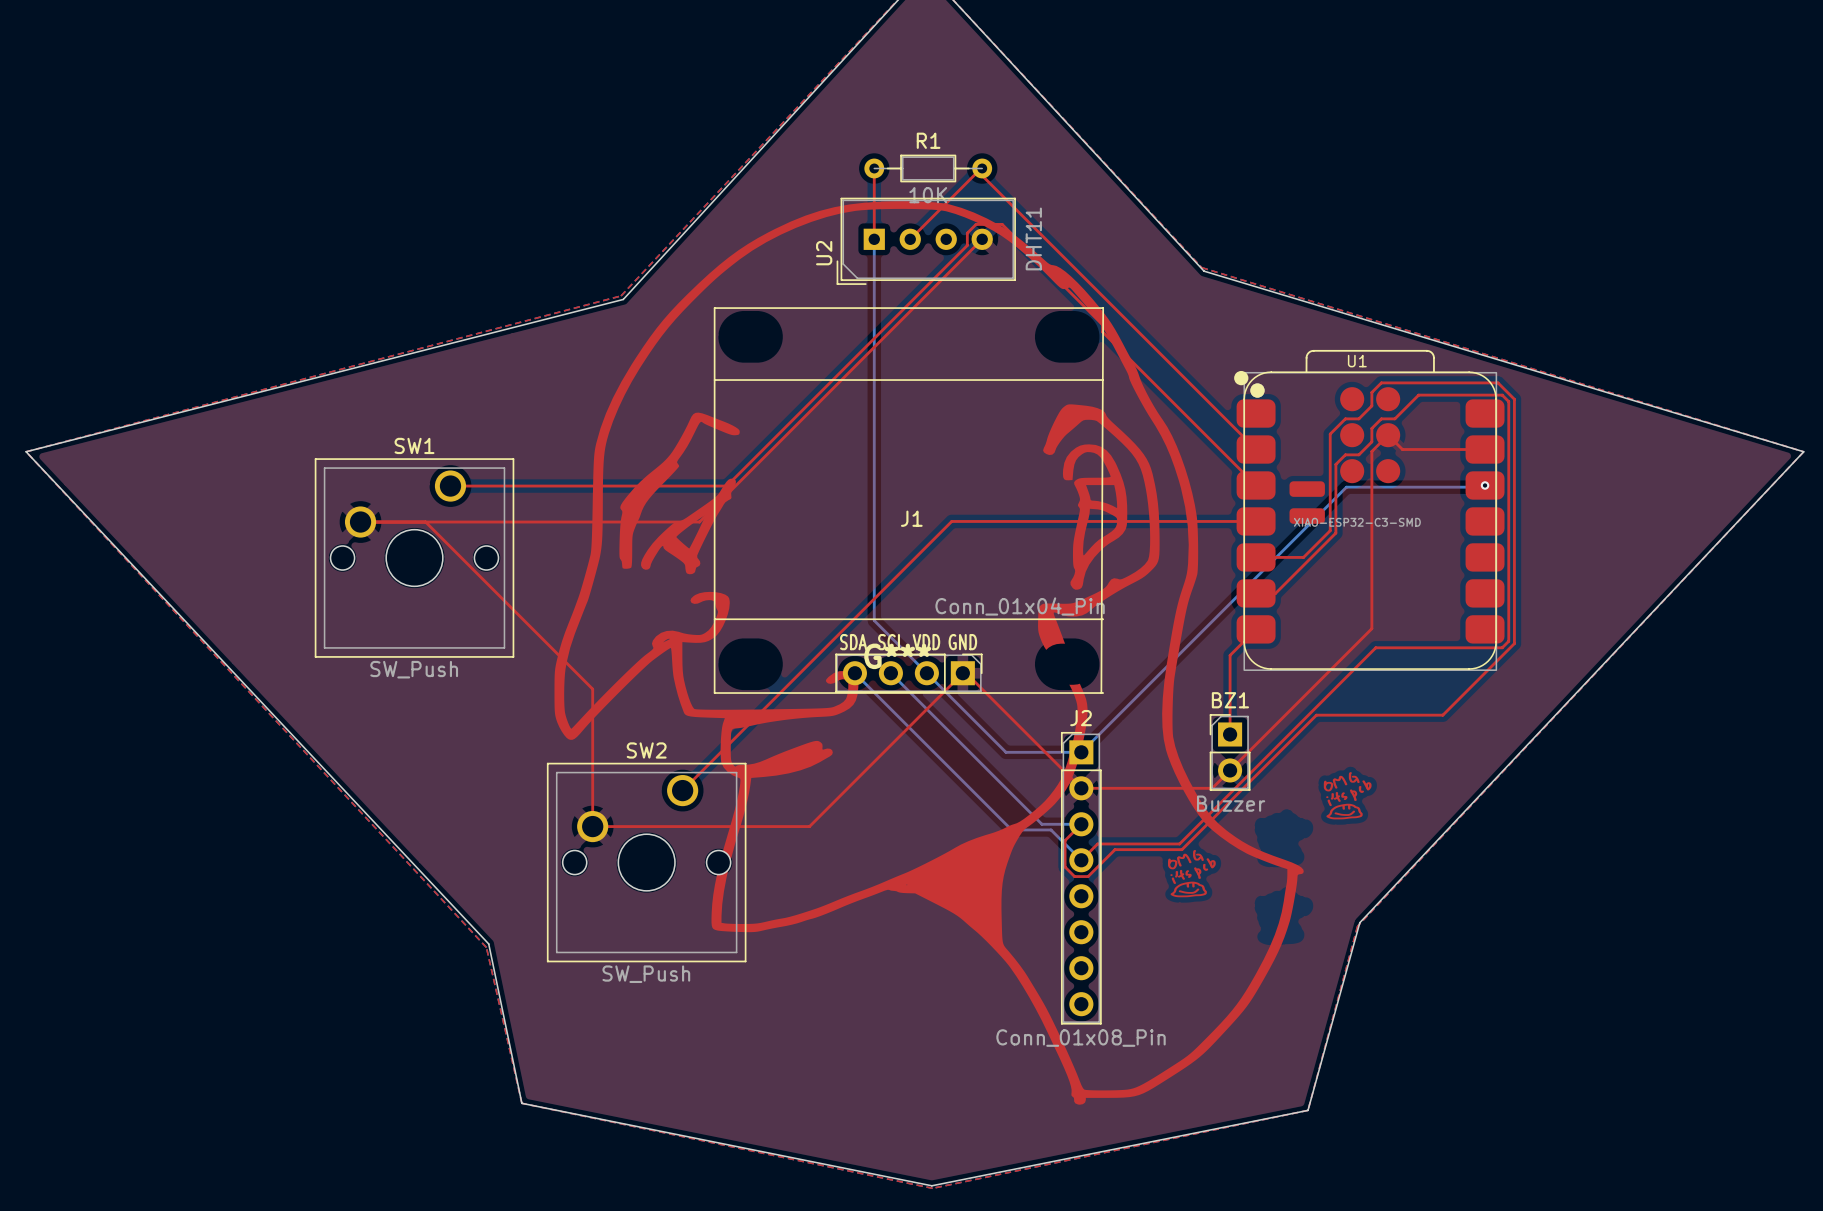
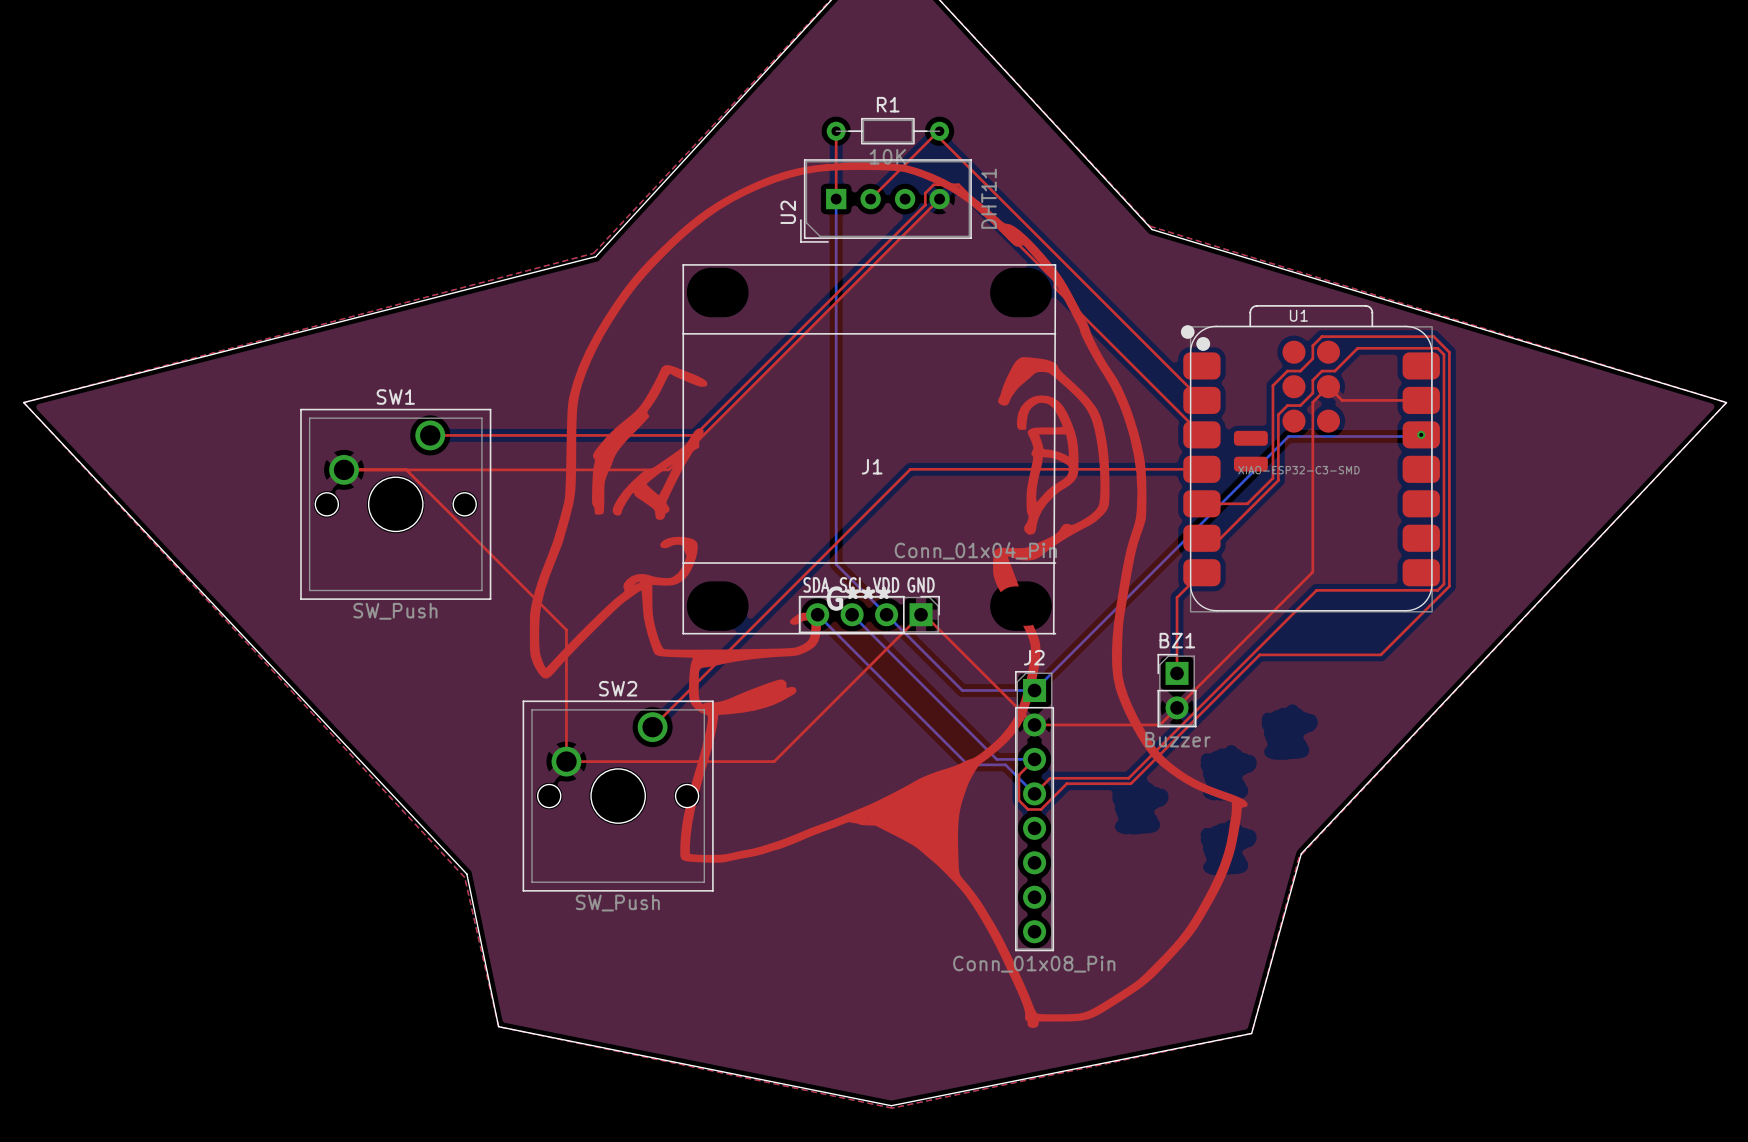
drawing: [1323, 772, 1372, 820] -> none
drawing: [1168, 850, 1216, 898] -> none

